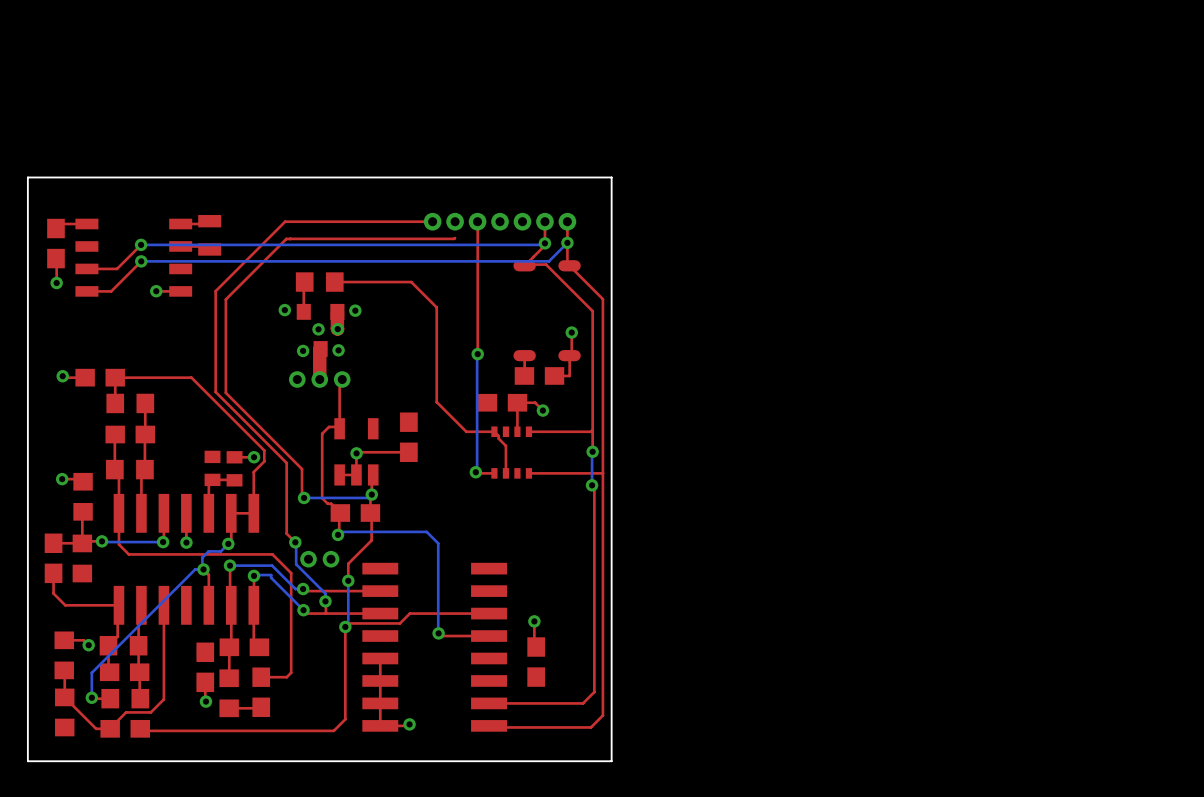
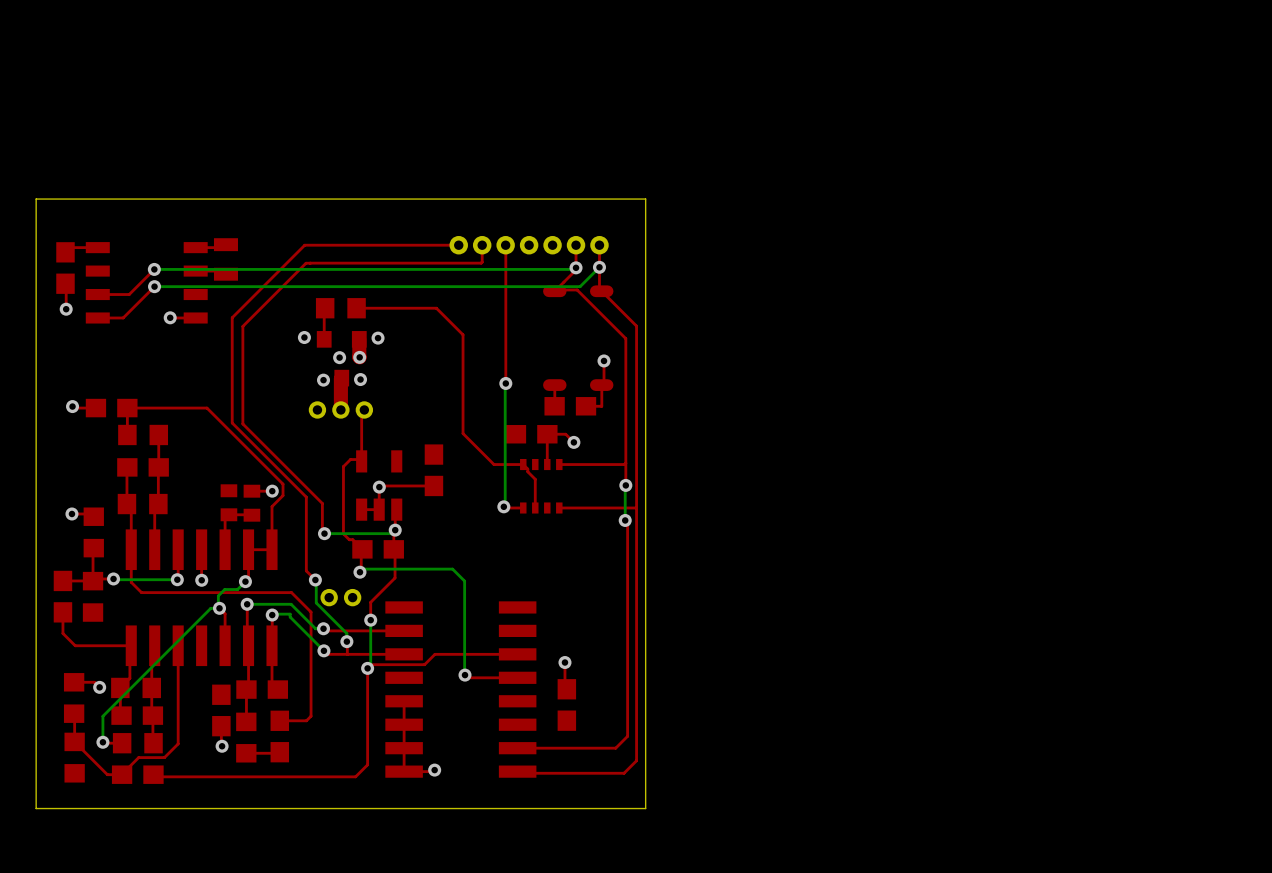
top track: none -> (482, 245) (482, 262)

